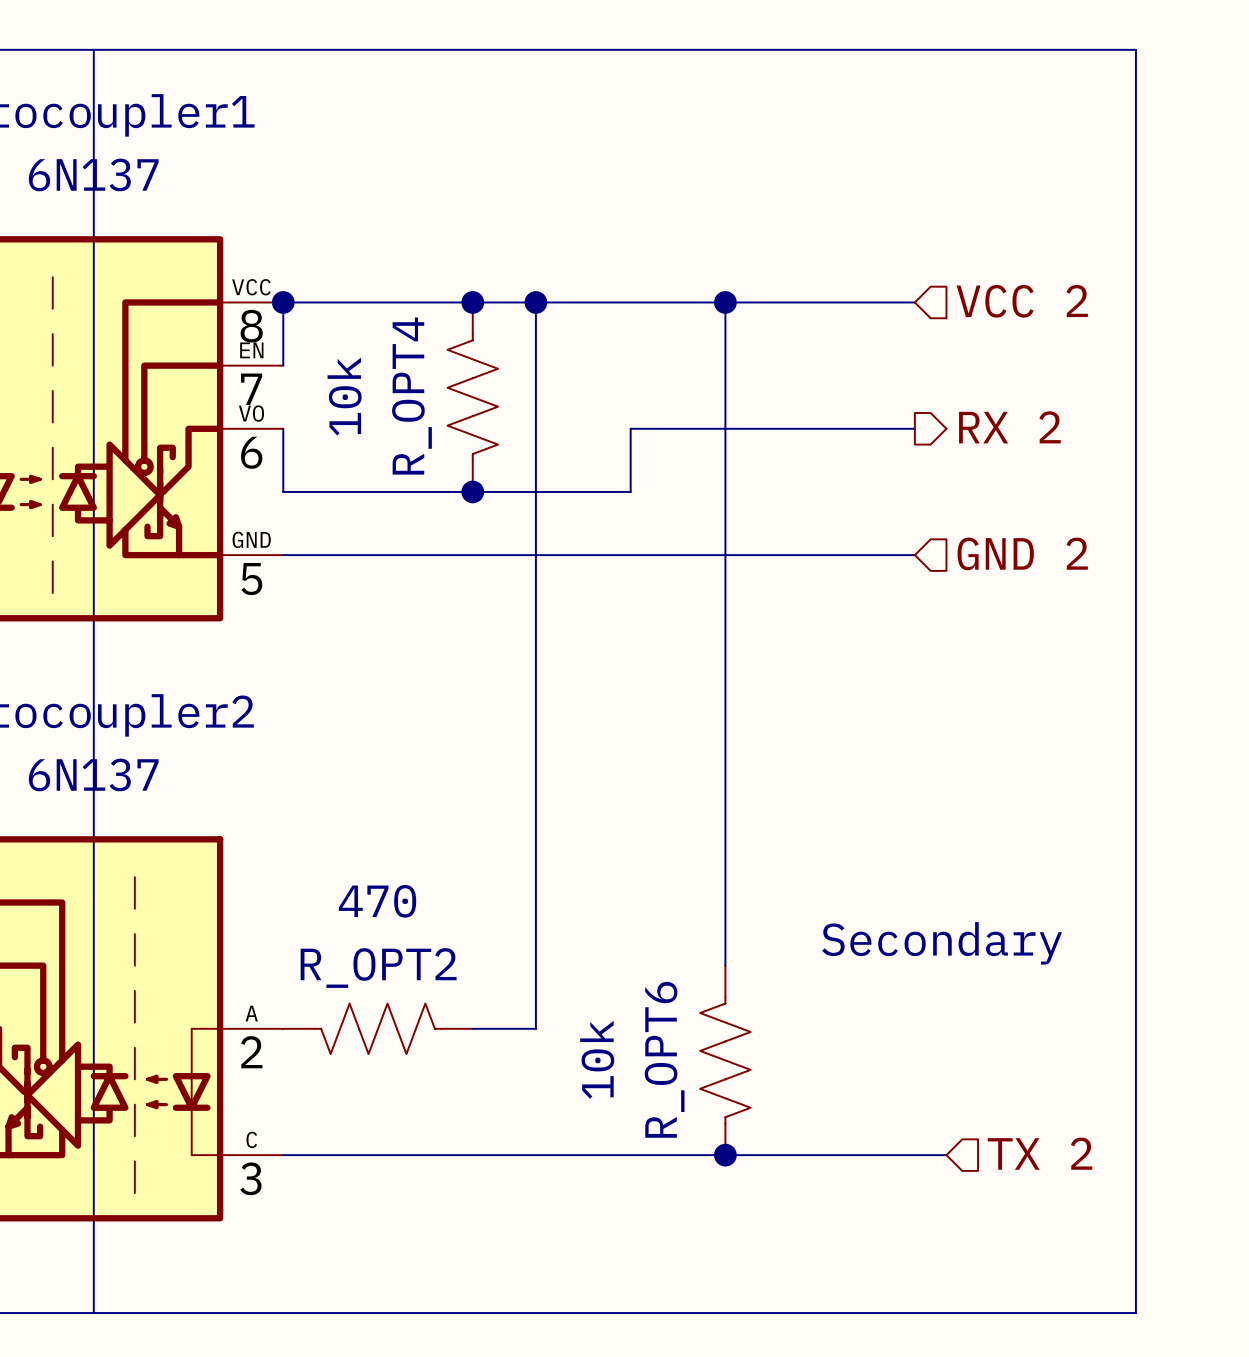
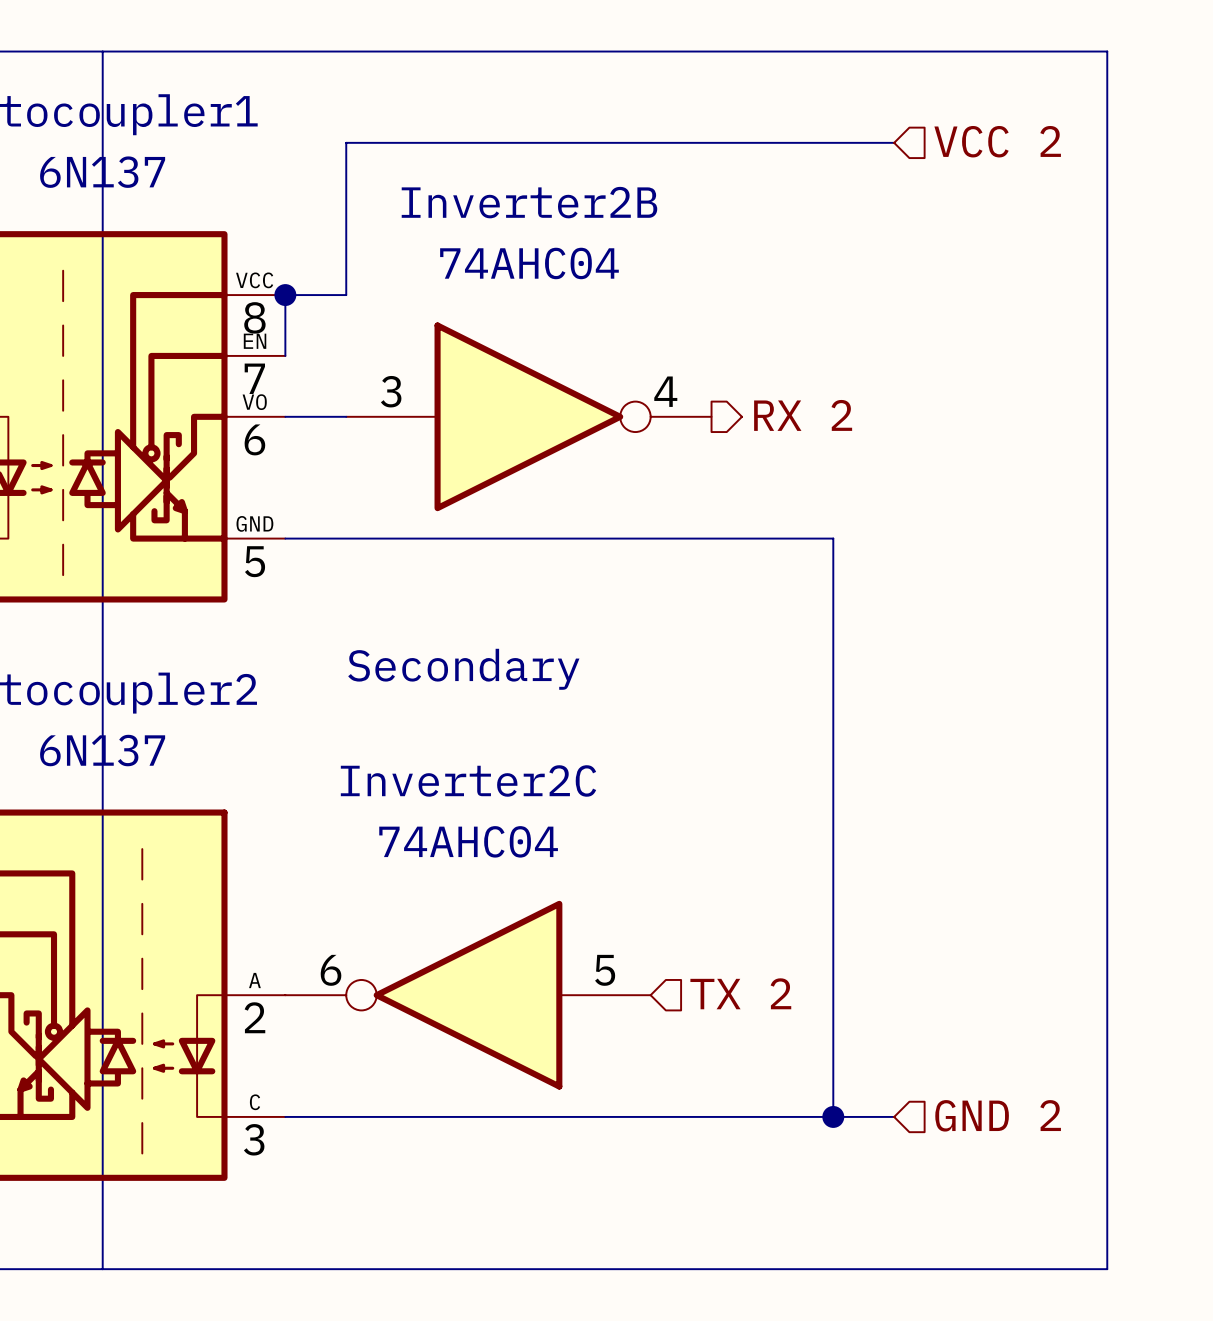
hierarchical label position: VCC 2 (1022, 301) -> VCC 2 (997, 141)
wire: (346, 302) (914, 302) -> (346, 295) (346, 142) (894, 142)
junction: (472, 302) -> none
wire: (535, 302) (535, 1028) (472, 1028) -> none
junction: (535, 302) -> none
wire: (725, 302) (725, 965) -> none
junction: (725, 302) -> none
R_OPT4: 10k (472, 397) -> none
hierarchical label position: RX 2 (1009, 427) -> RX 2 (803, 415)
wire: (283, 428) (283, 491) (630, 491) (630, 428) (914, 428) -> (285, 416) (346, 416)
Inverter2B: none -> 74AHC04 (528, 416)
junction: (472, 491) -> none
hierarchical label position: GND 2 (1022, 553) -> GND 2 (998, 1115)
wire: (851, 555) (914, 555) -> (833, 538) (833, 1116)
text position: Secondary (942, 943) -> Secondary (463, 669)
R_OPT2: 470 (378, 1028) -> none
Inverter2C: none -> 74AHC04 (468, 995)
R_OPT6: 10k (725, 1060) -> none
hierarchical label position: TX 2 (1040, 1153) -> TX 2 (740, 993)
junction position: (725, 1155) -> (833, 1116)
wire: (914, 1155) (946, 1155) -> none

